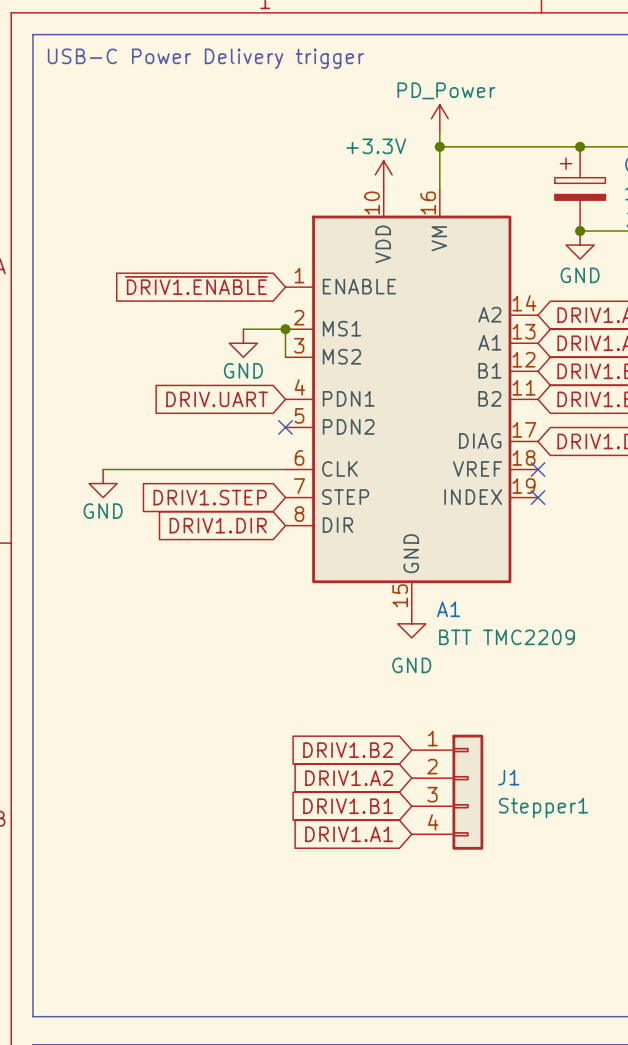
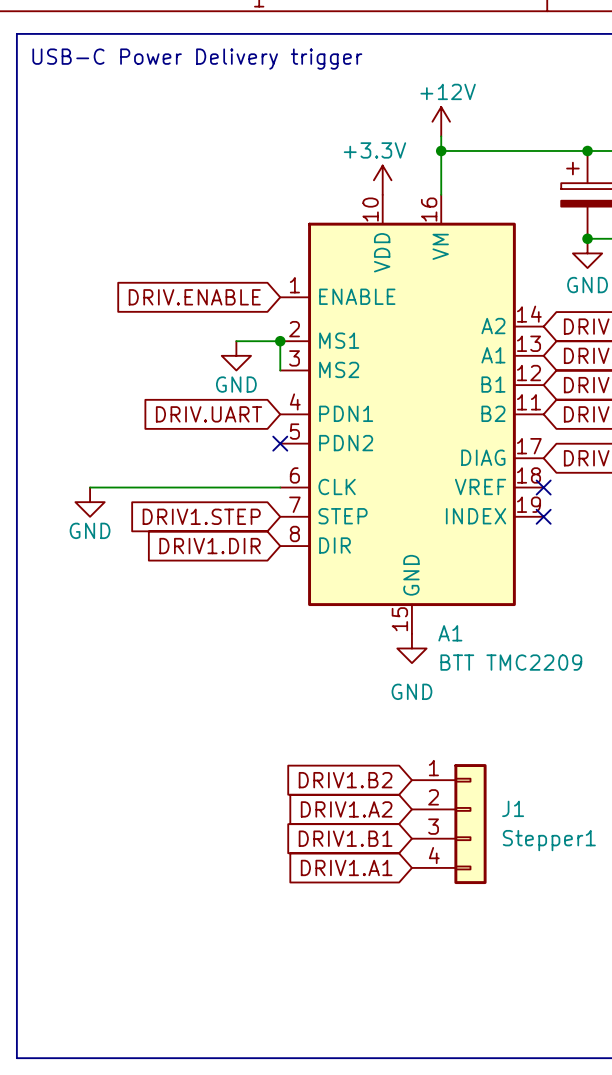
power symbol: PD_Power (439, 118) -> +12V (441, 121)
global label: ~{DRIV1.ENABLE} (196, 285) -> DRIV.ENABLE (194, 297)

